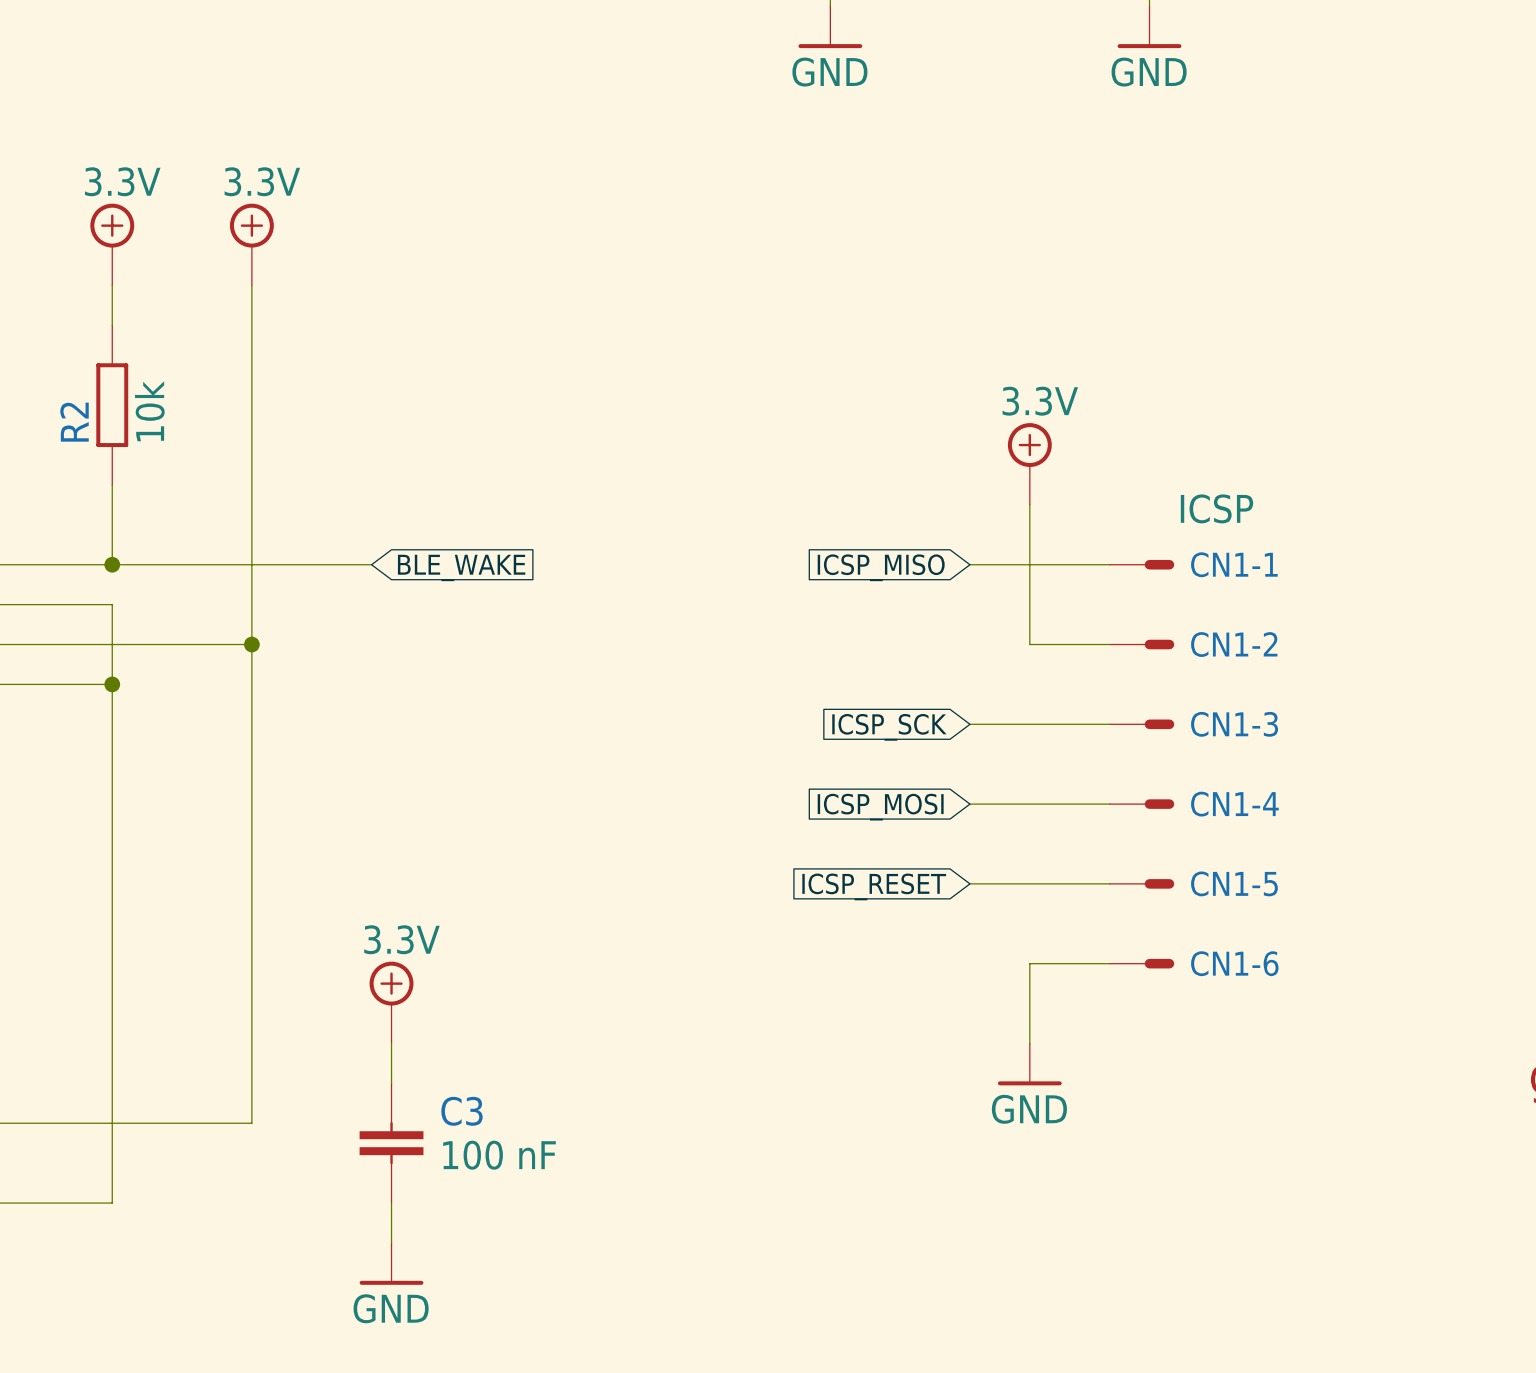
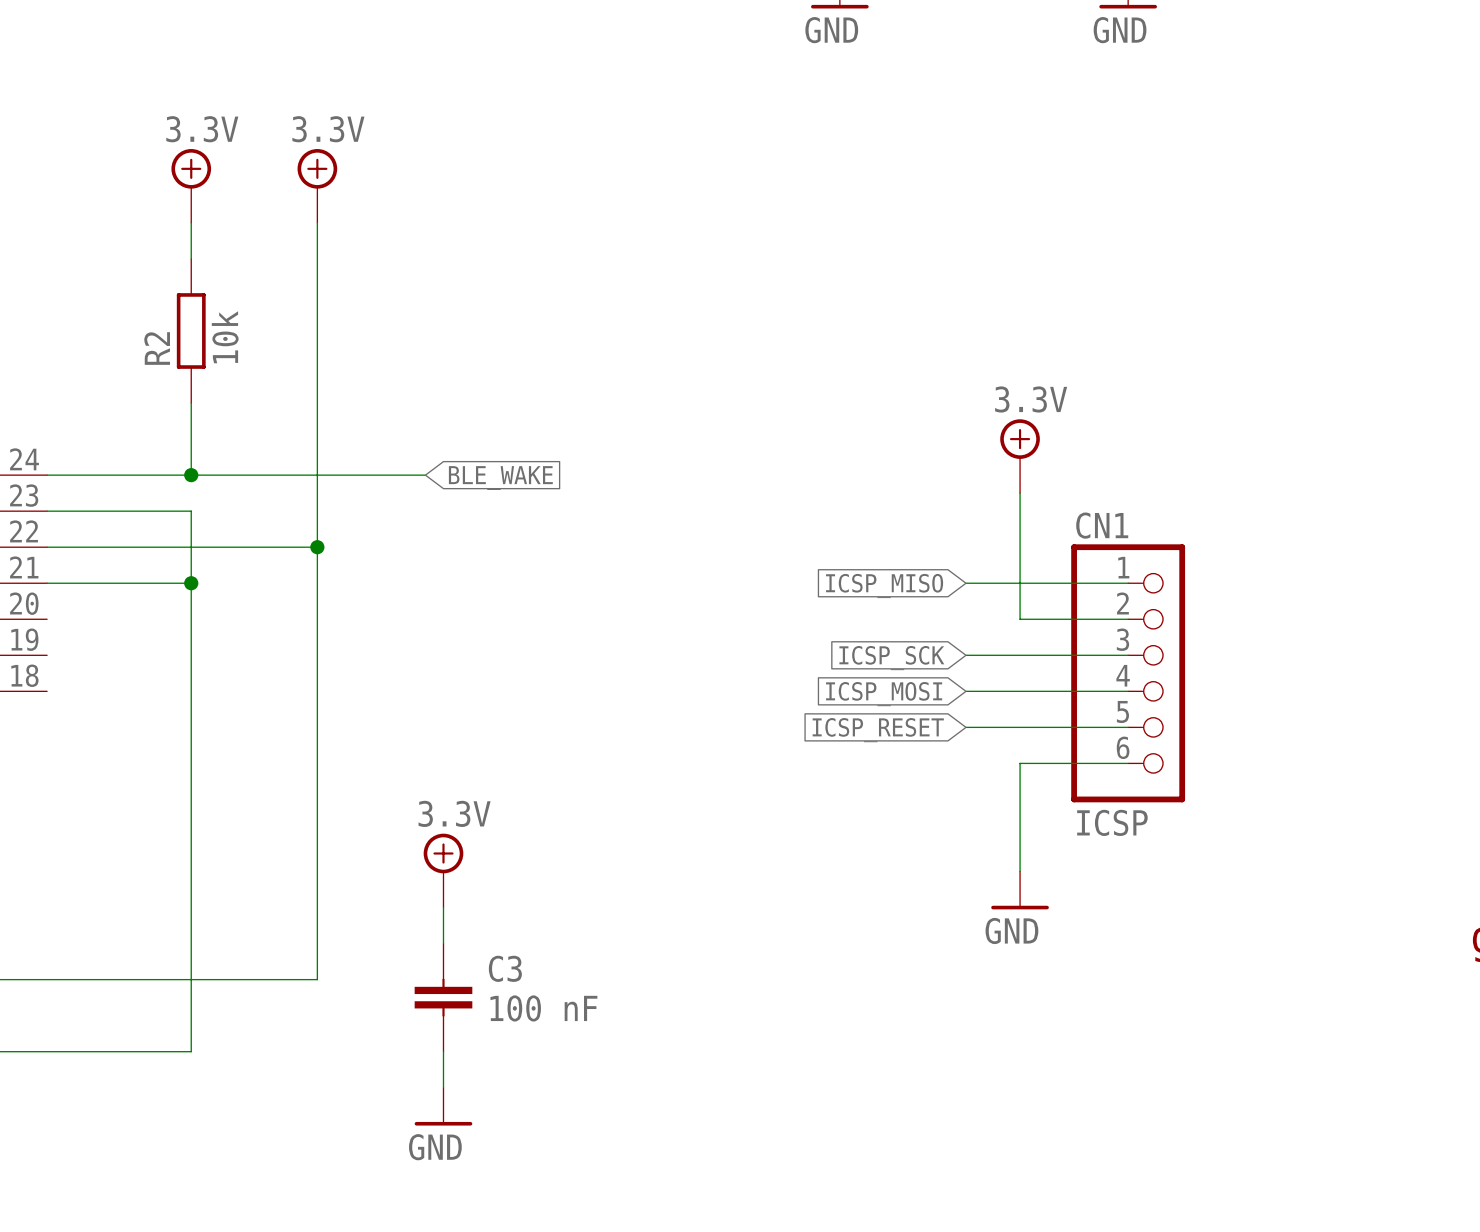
power symbol position: 3.3V (1029, 464) -> 3.3V (1020, 456)
wire: (969, 564) (1109, 564) -> none
CN1-1: ICSP (1141, 564) -> none
global label position: ICSP_MISO (881, 567) -> ICSP_MISO (884, 585)
wire: (1029, 644) (1109, 644) -> none
CN1-2: (1141, 644) -> none
wire: none -> (965, 583) (1128, 583)
wire: (969, 724) (1029, 724) -> (1020, 547) (1020, 619)
CN1-3: (1141, 724) -> none
global label position: ICSP_SCK (889, 727) -> ICSP_SCK (891, 658)
wire: none -> (965, 655) (1128, 655)
CN1: none -> ICSP (1128, 673)
CN1-4: (1141, 804) -> none
wire: none -> (965, 727) (1128, 727)
wire: (969, 883) (1029, 883) -> (1020, 835) (1020, 763)
CN1-5: (1141, 883) -> none
global label position: ICSP_RESET (874, 886) -> ICSP_RESET (878, 730)
wire: (1029, 963) (1109, 963) -> none
CN1-6: (1141, 963) -> none
power symbol position: GND (1029, 1064) -> GND (1020, 890)

